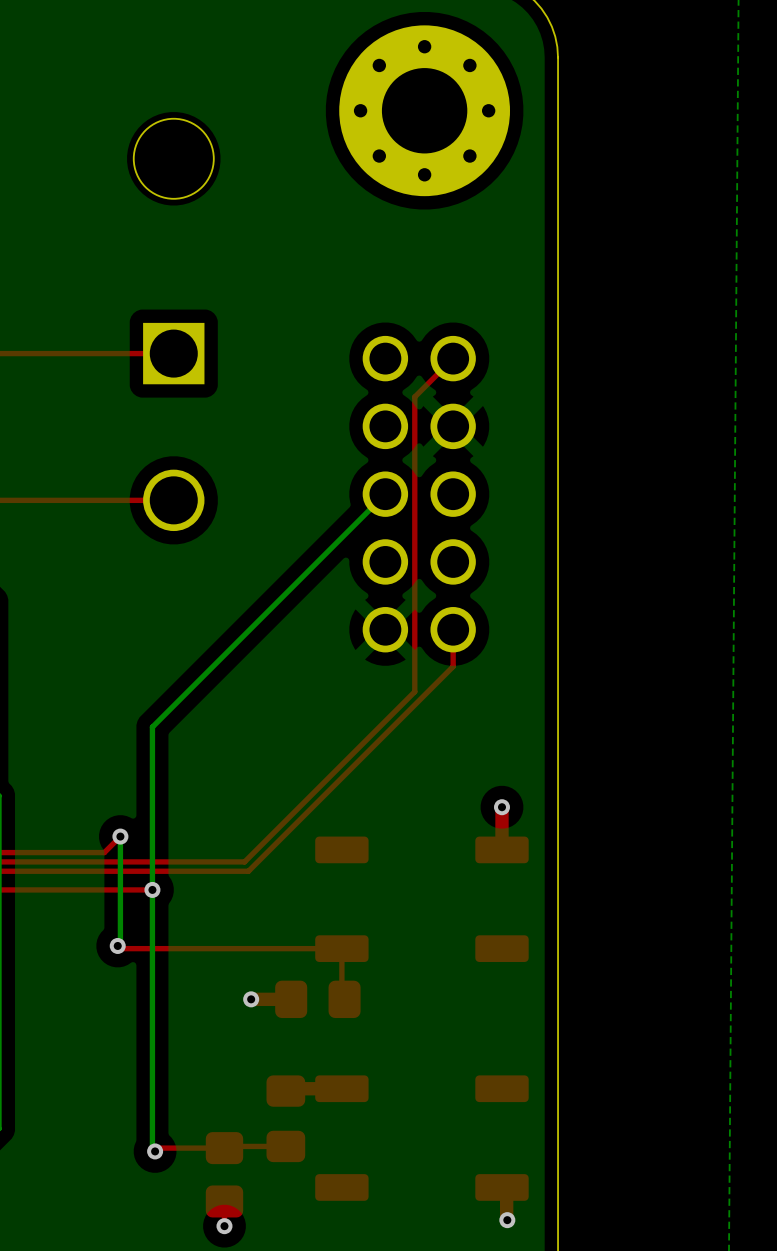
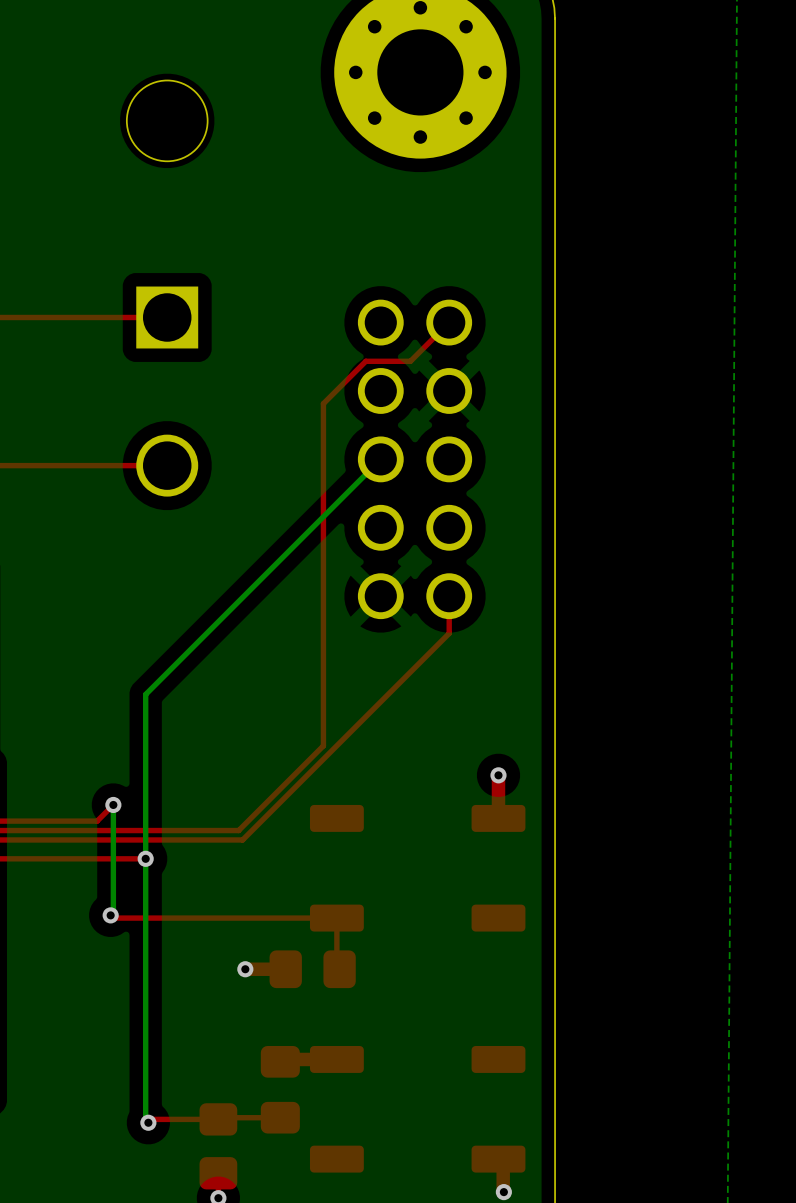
top track: (414, 396) (414, 691) (328, 777) -> (410, 361) (365, 361) (323, 403) (323, 745)

